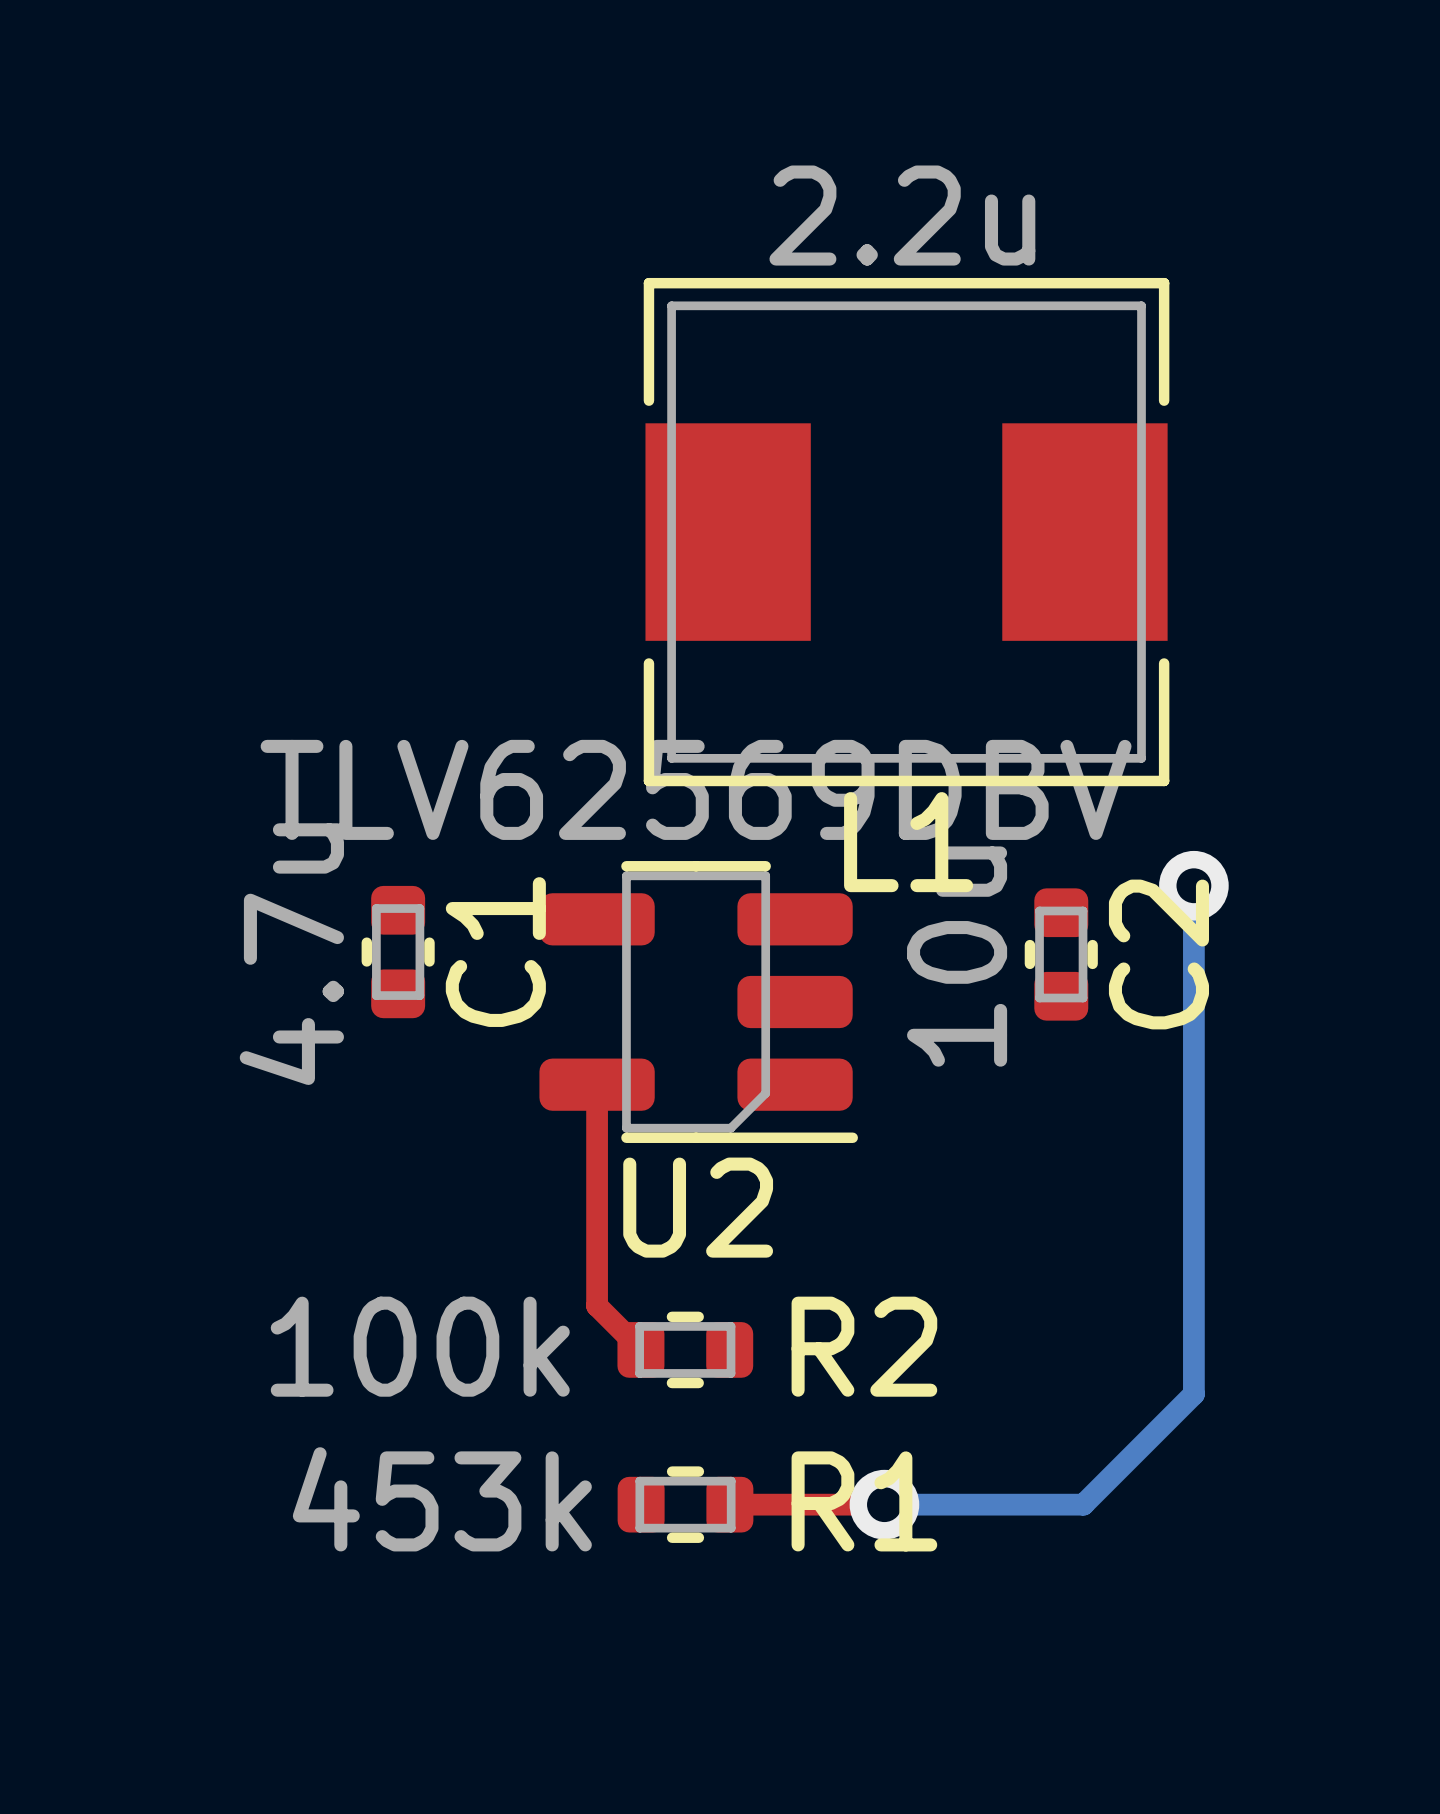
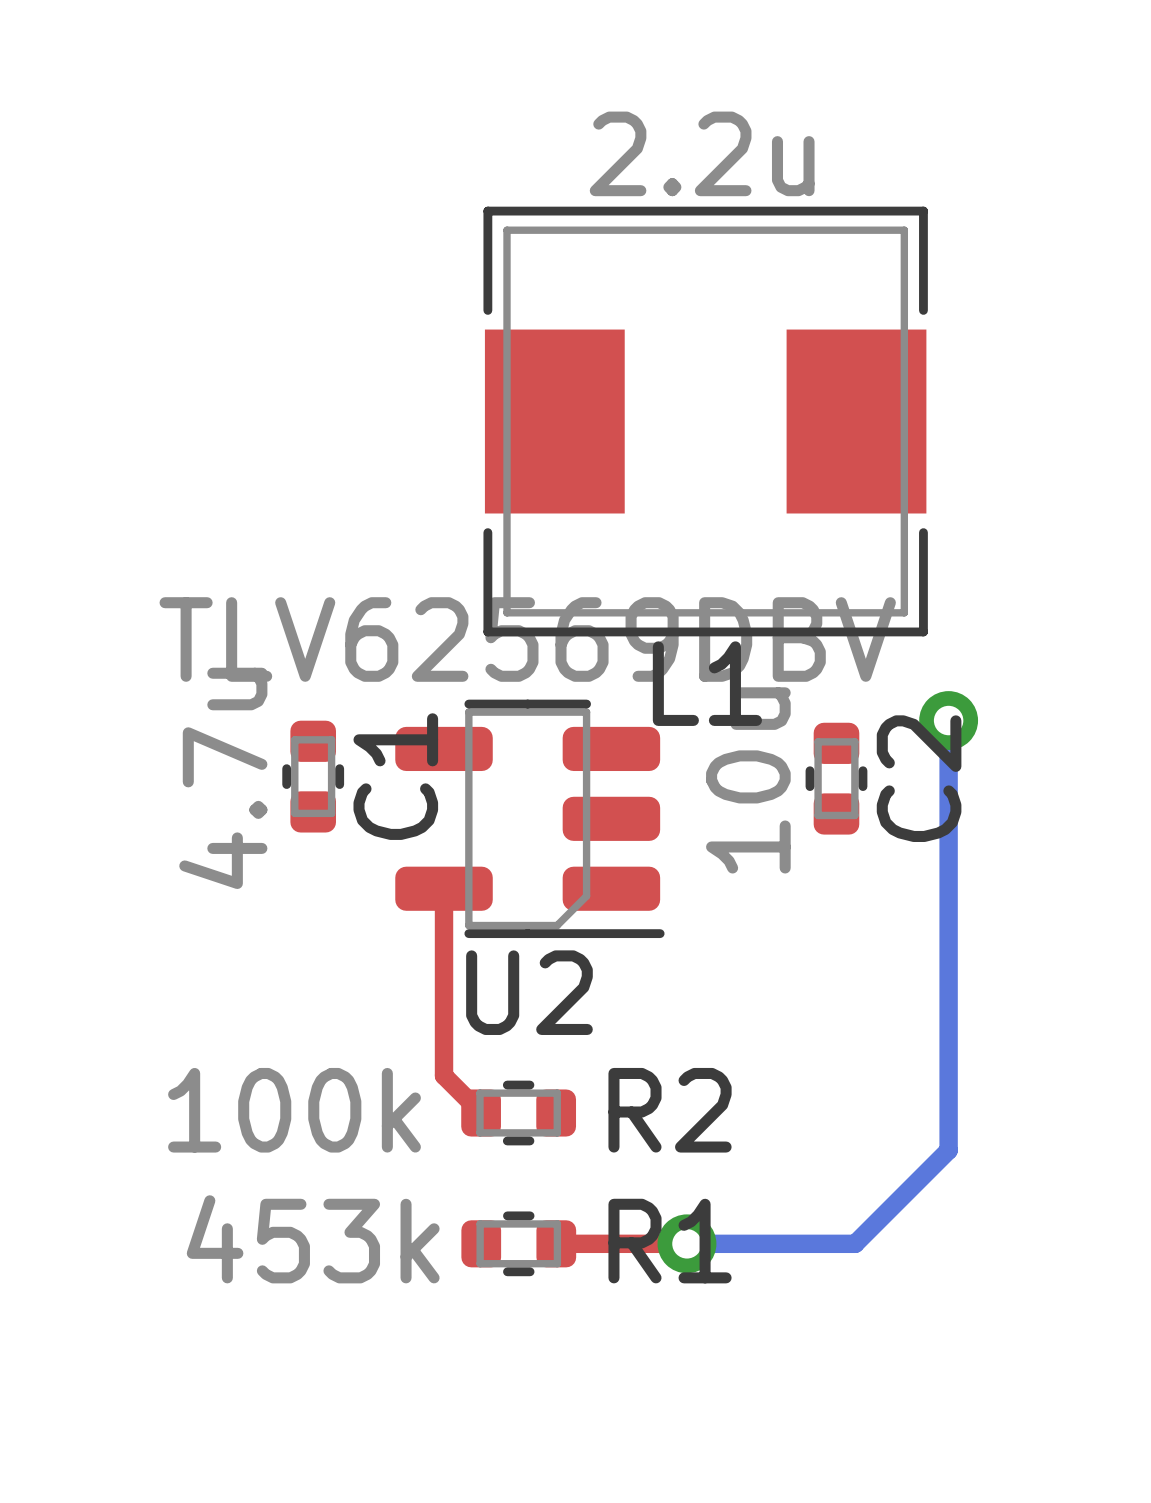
C1 position: (398, 952) -> (313, 776)

